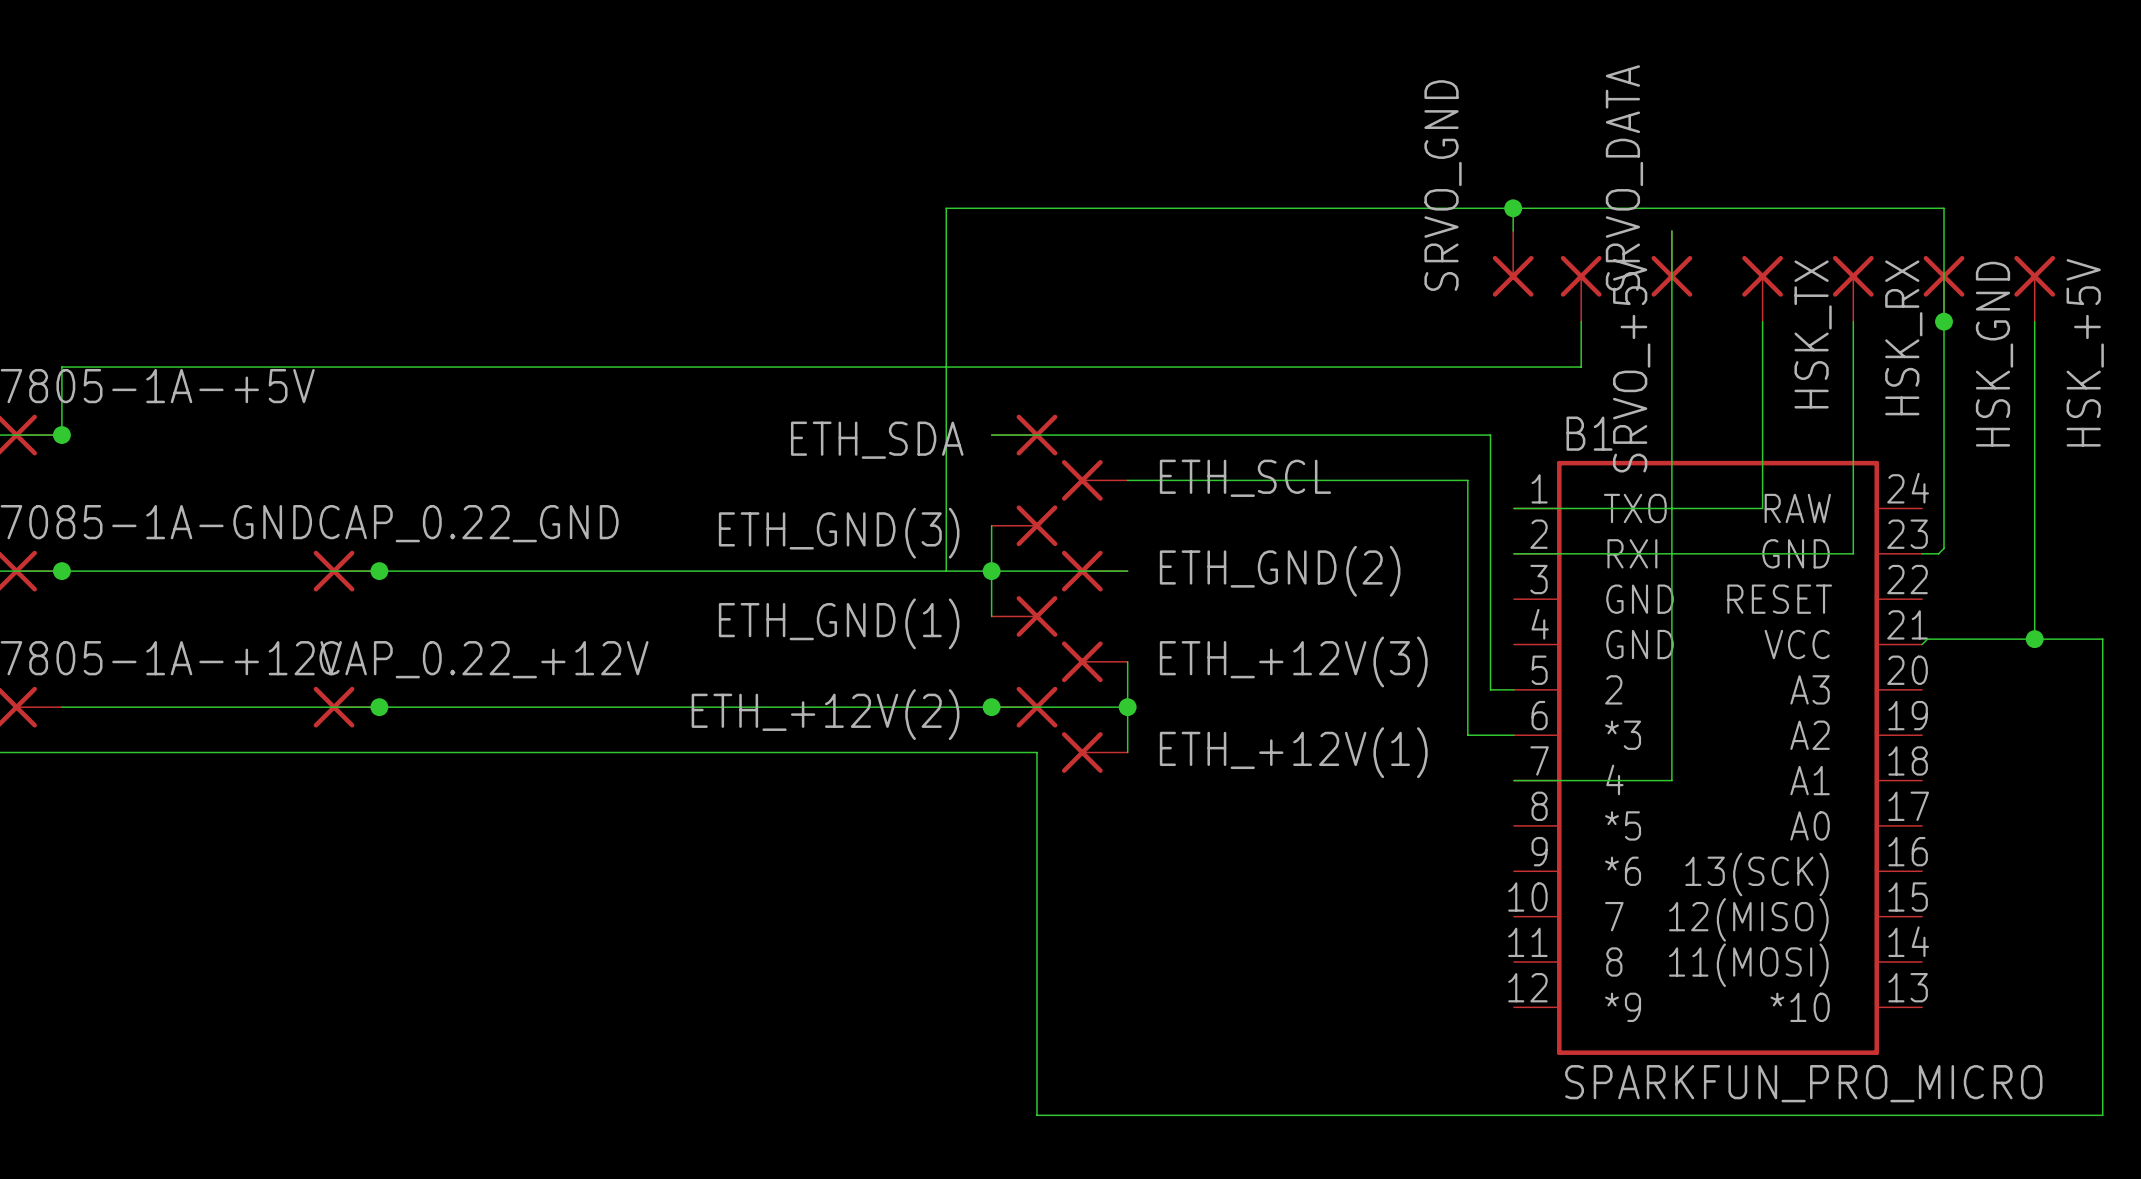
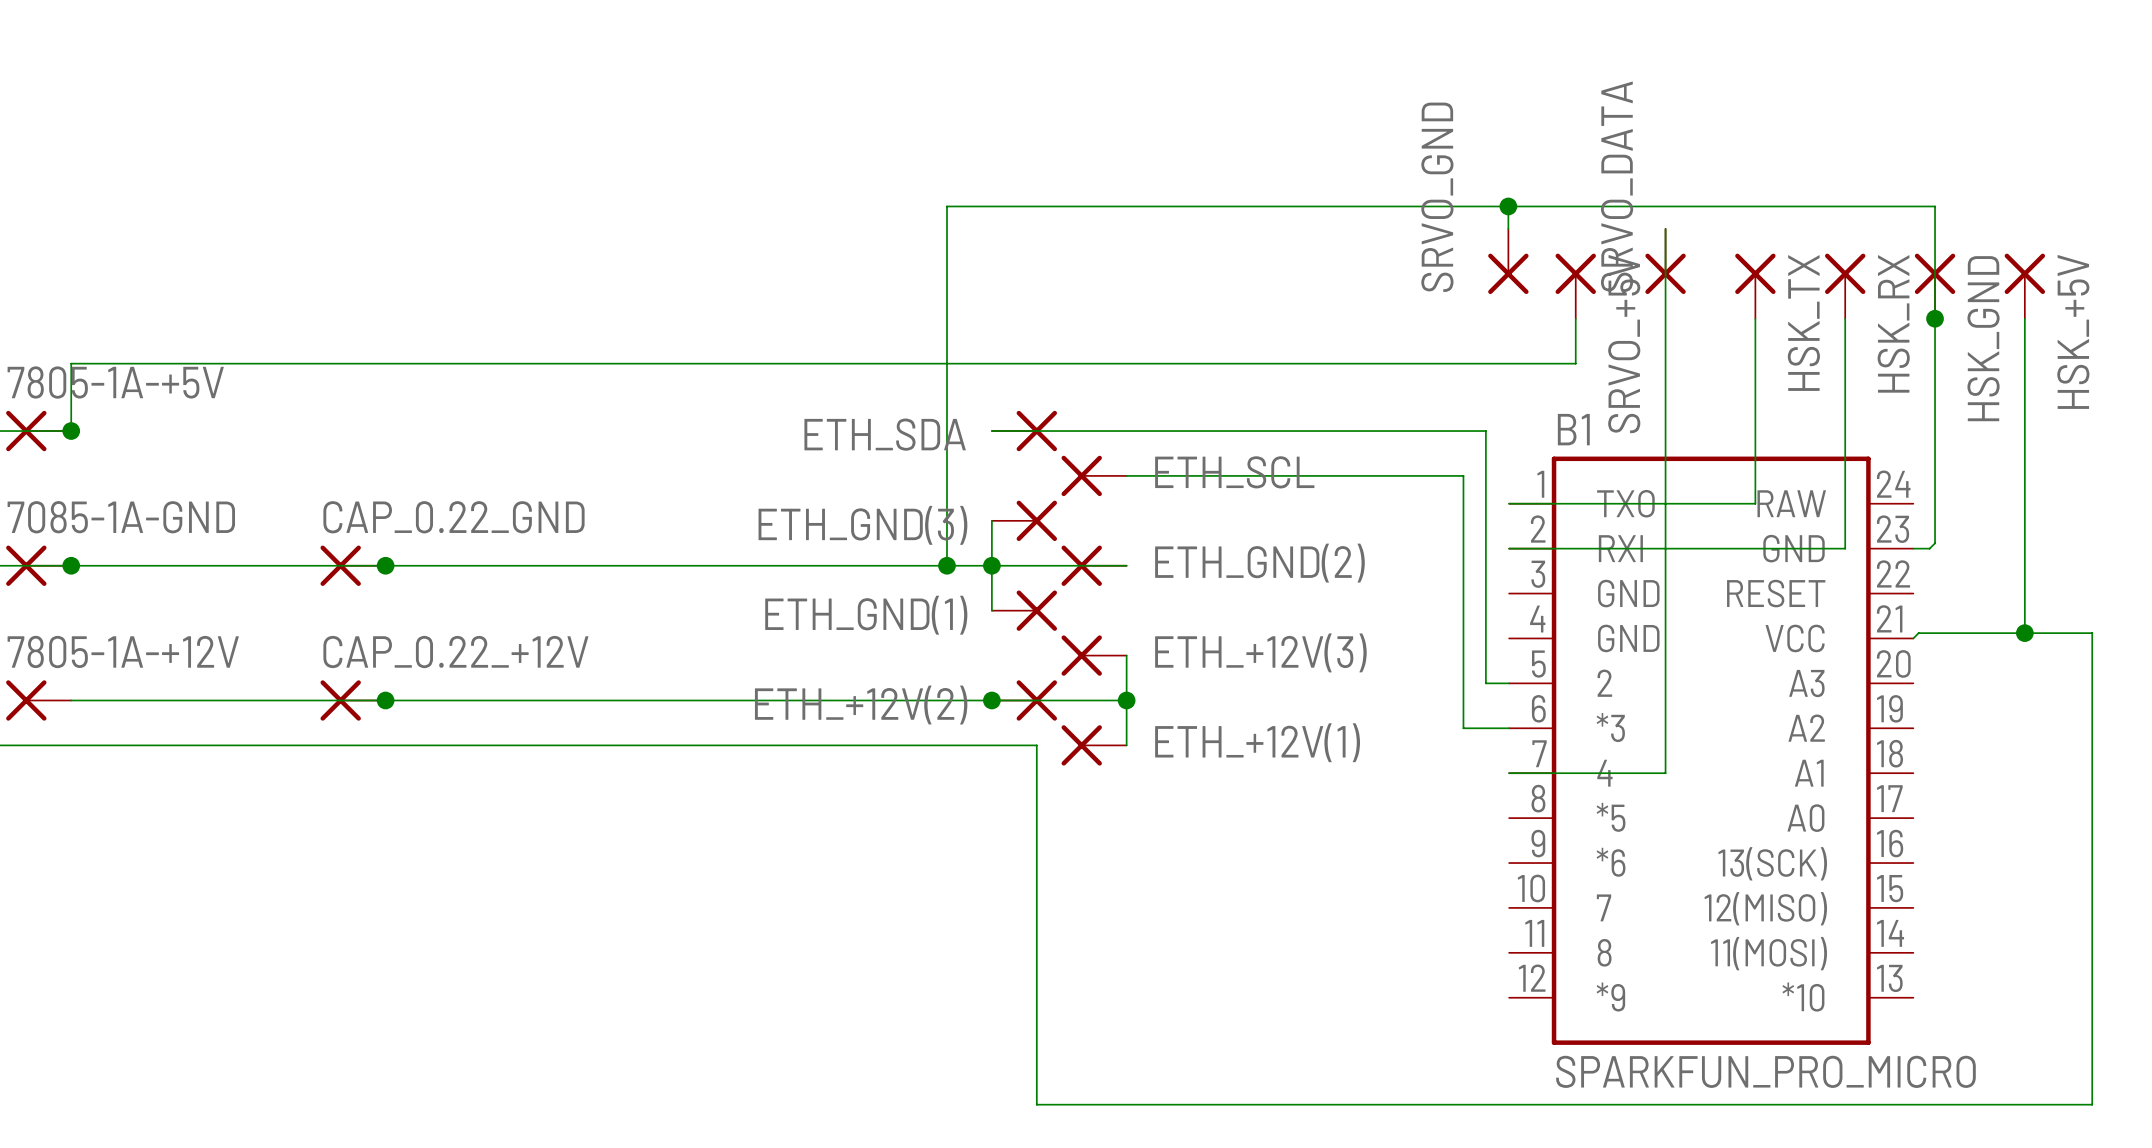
junction: none -> (946, 565)

